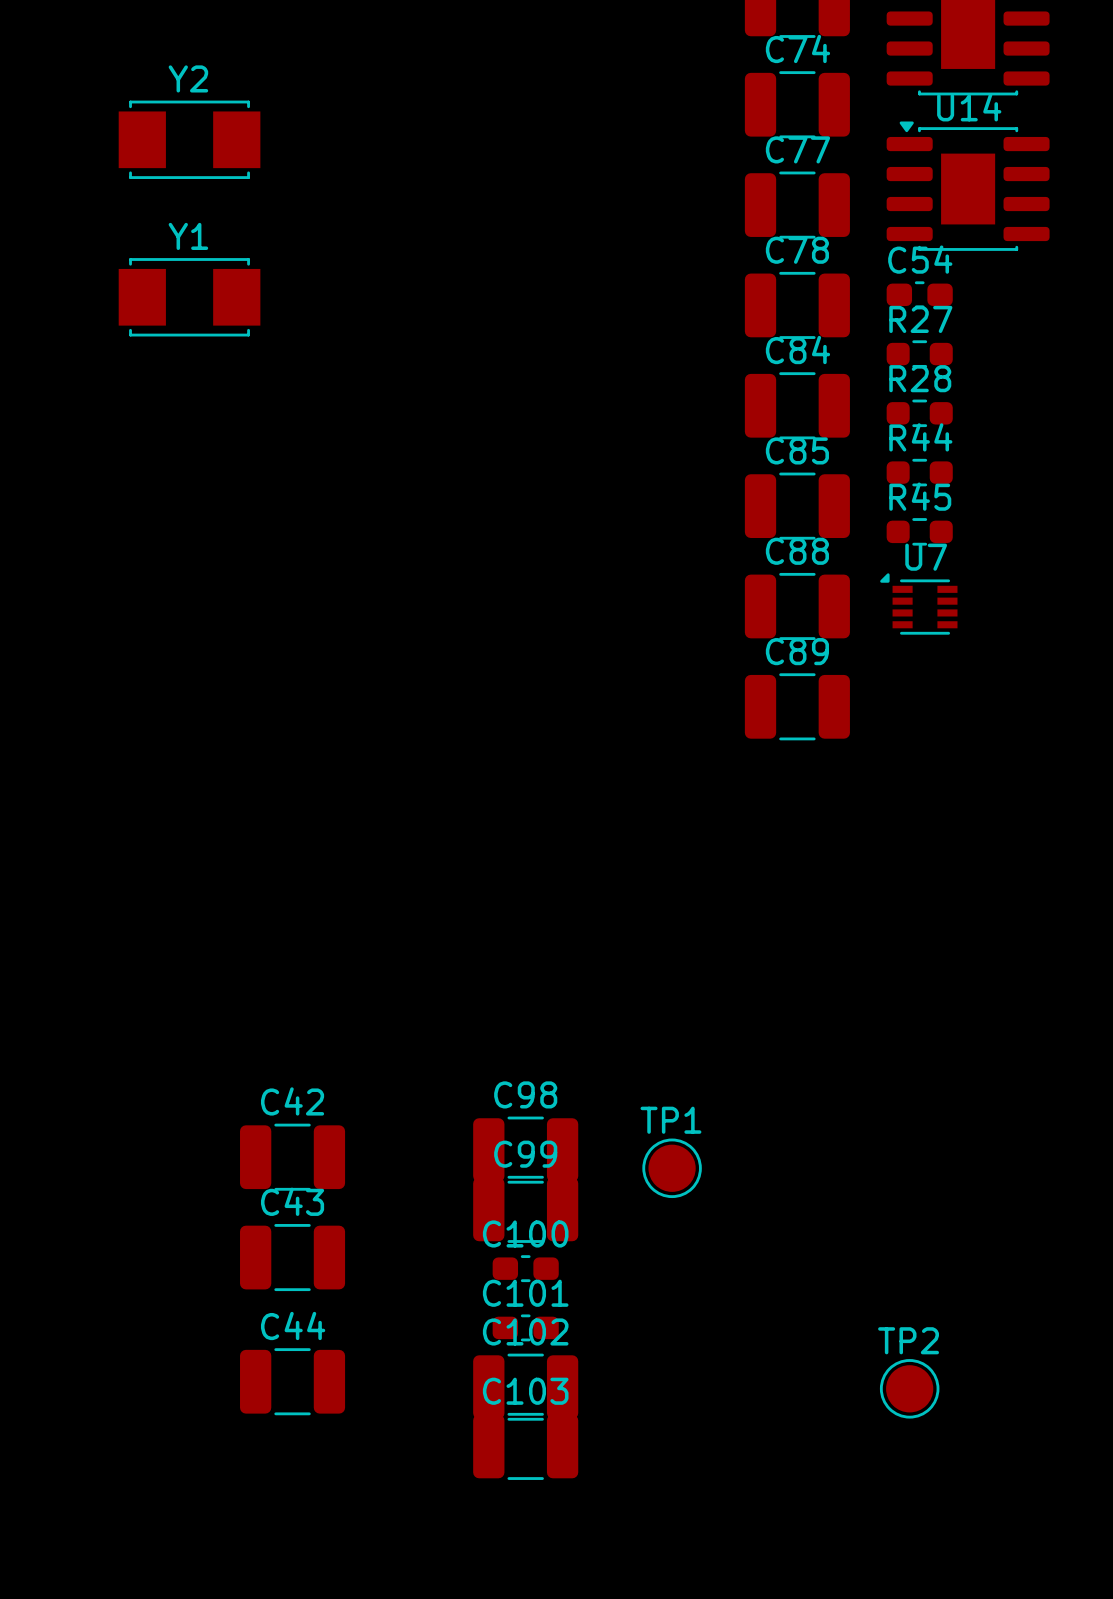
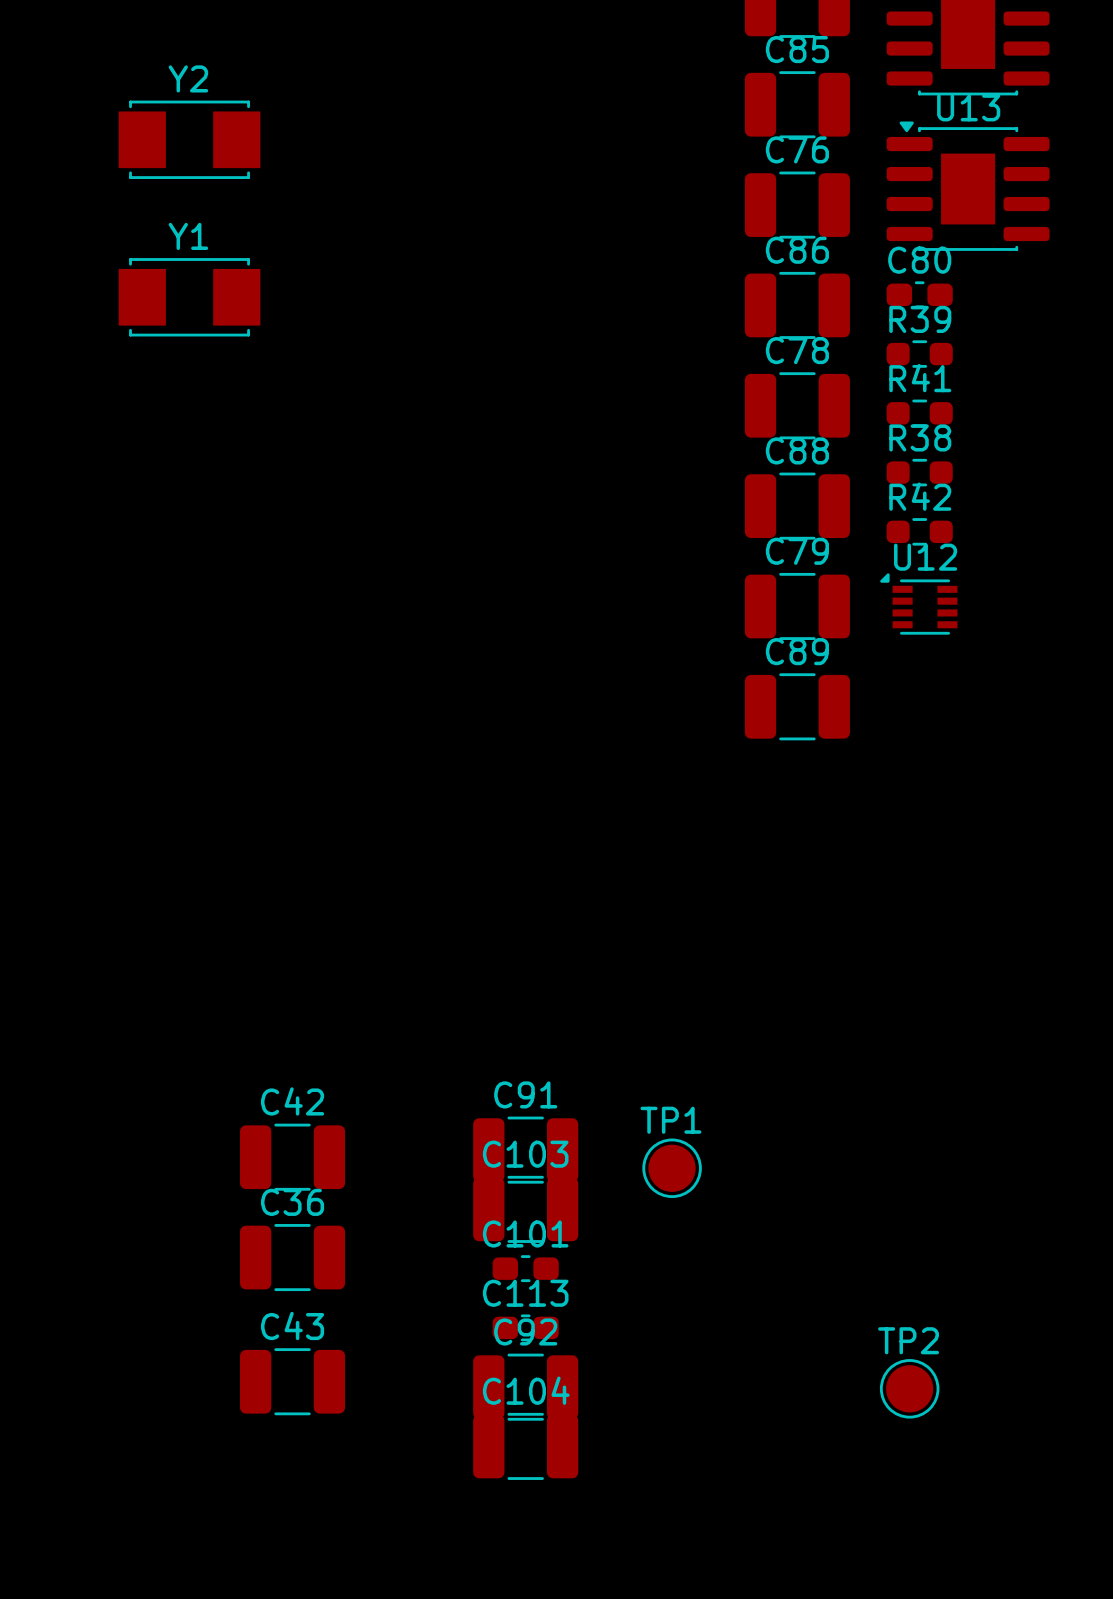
C74 name: C74 (797, 48) -> C85 (797, 49)
U14 name: U14 (969, 107) -> U13 (968, 107)
C77 name: C77 (797, 149) -> C76 (797, 149)
C78 name: C78 (797, 250) -> C86 (797, 250)
C54 name: C54 (920, 259) -> C80 (919, 260)
R27 name: R27 (920, 319) -> R39 (920, 319)
C84 name: C84 (797, 350) -> C78 (797, 350)
R28 name: R28 (920, 378) -> R41 (920, 378)
R44 name: R44 (920, 437) -> R38 (920, 437)
C85 name: C85 (797, 450) -> C88 (797, 450)
R45 name: R45 (920, 496) -> R42 (920, 496)
C88 name: C88 (797, 551) -> C79 (797, 551)
U7 name: U7 (926, 557) -> U12 (925, 557)
C98 name: C98 (525, 1094) -> C91 (525, 1094)
C99 name: C99 (525, 1154) -> C103 (525, 1154)
C43 name: C43 (292, 1201) -> C36 (292, 1202)
C100 name: C100 (525, 1233) -> C101 (525, 1233)
C101 name: C101 (525, 1293) -> C113 (525, 1293)
C44 name: C44 (293, 1325) -> C43 (292, 1325)
C102 name: C102 (525, 1331) -> C92 (525, 1331)
C103 name: C103 (525, 1391) -> C104 (526, 1390)

